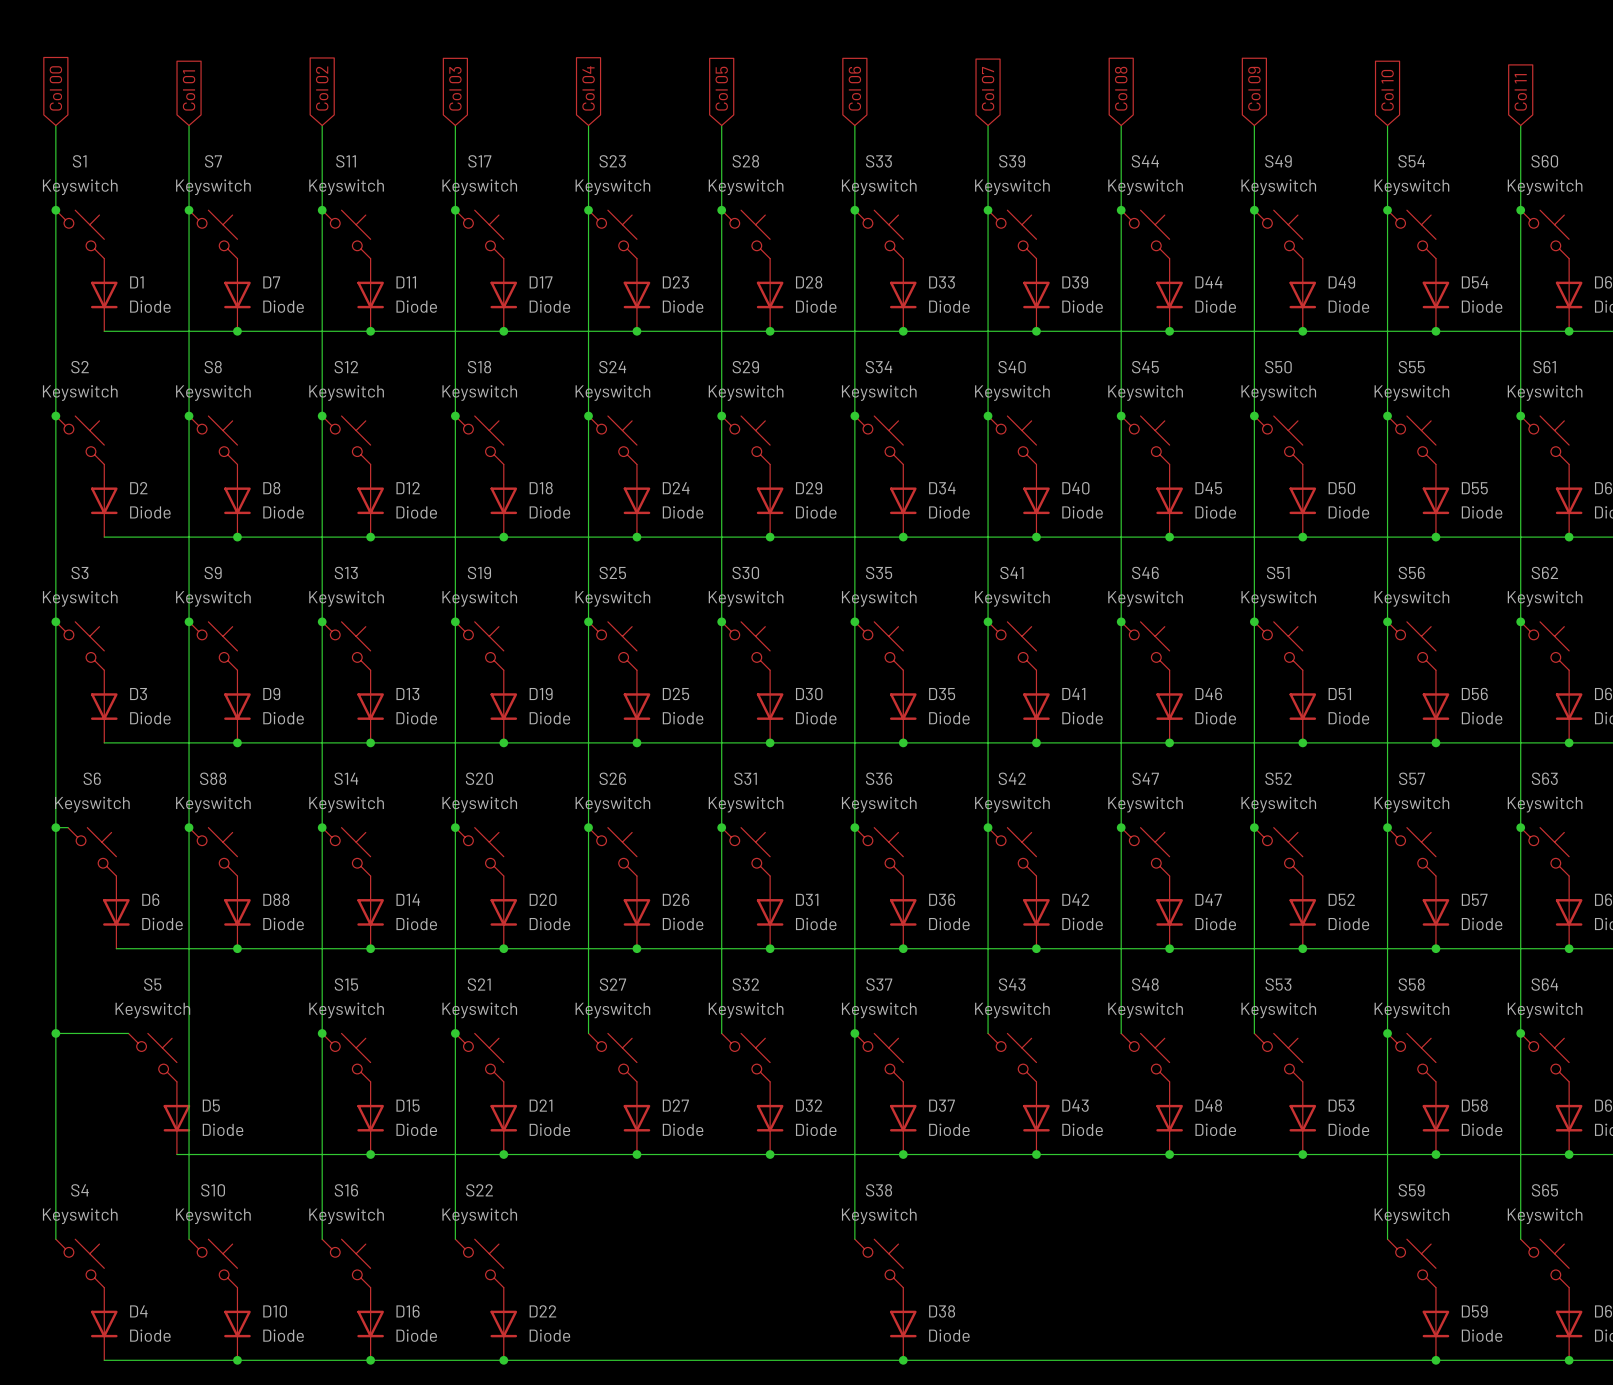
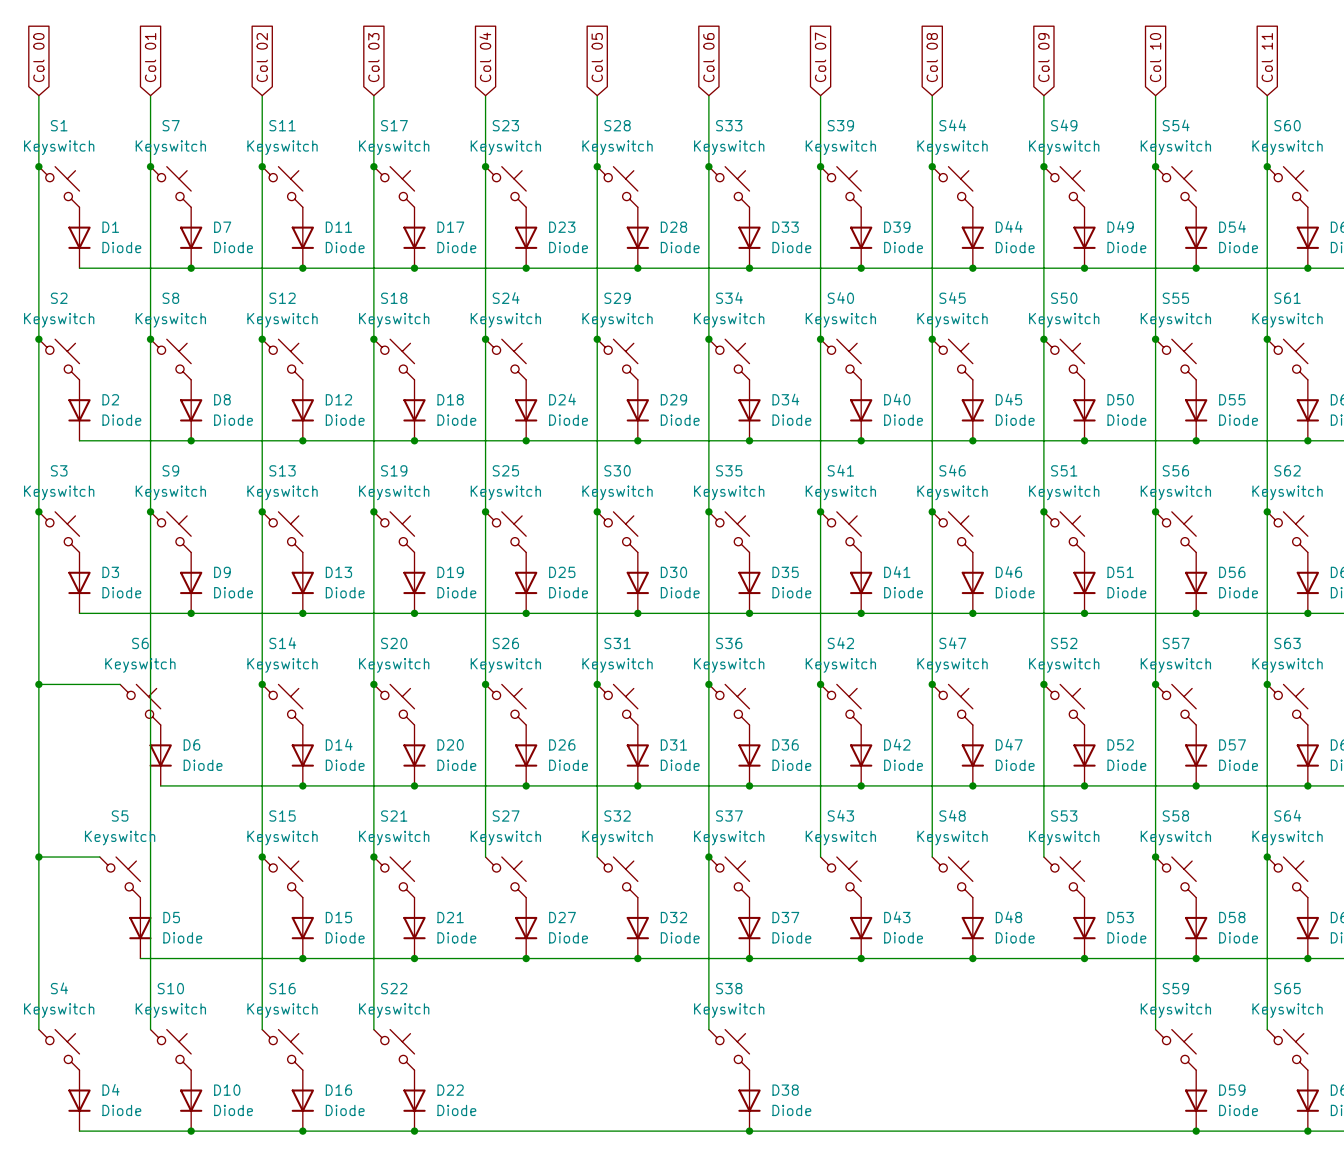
junction: (189, 827) -> none
S6 position: (92, 851) -> (140, 704)
S88: Keyswitch (213, 851) -> none
D6 position: (116, 912) -> (160, 755)
D88: Diode (237, 912) -> none
wire: (116, 948) (201, 948) -> (49, 684) (120, 684)
junction: (237, 948) -> none

